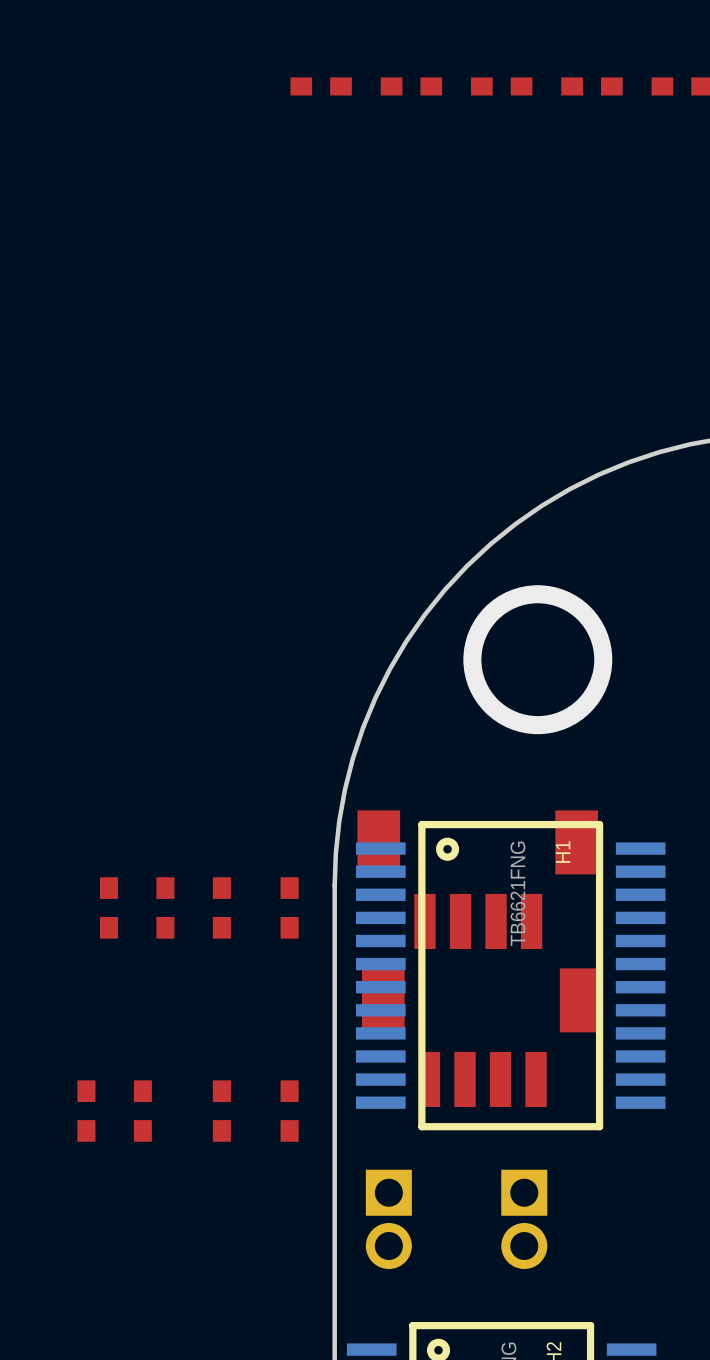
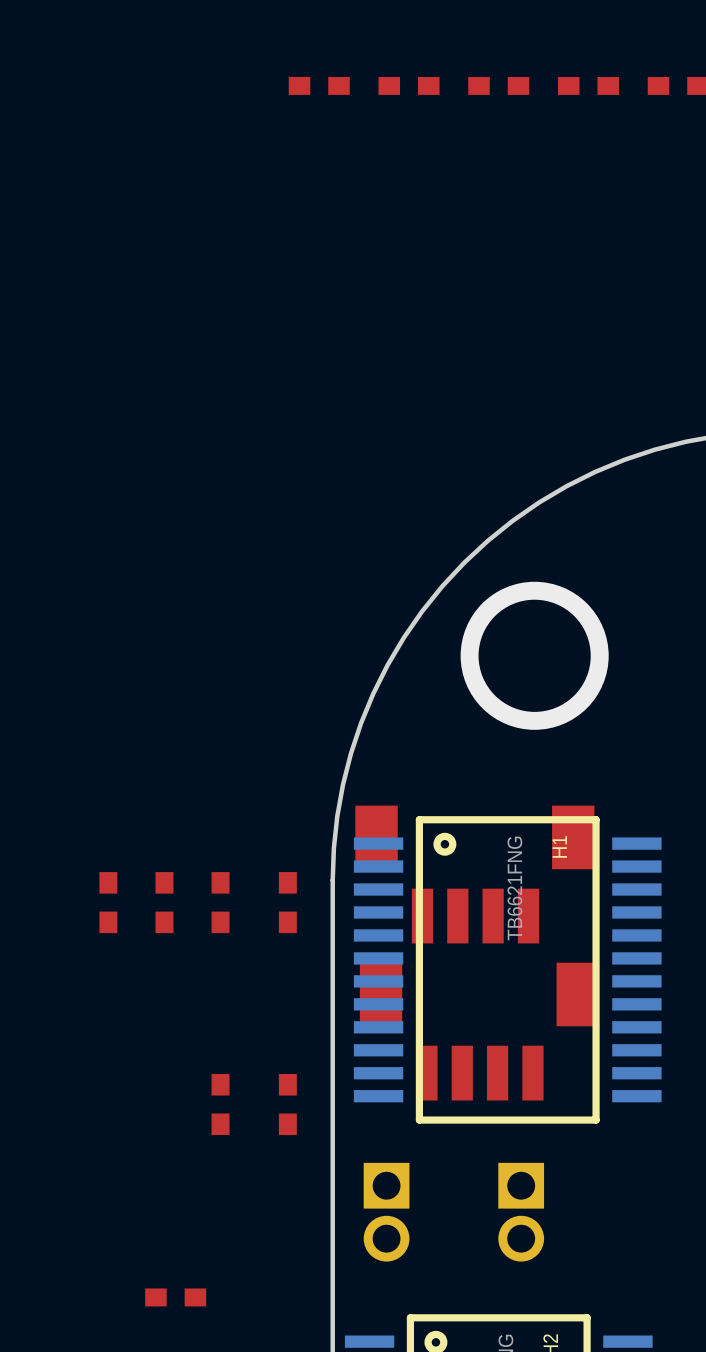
part: (86, 1111) -> none
part: (142, 1111) -> none
part: none -> (175, 1297)

